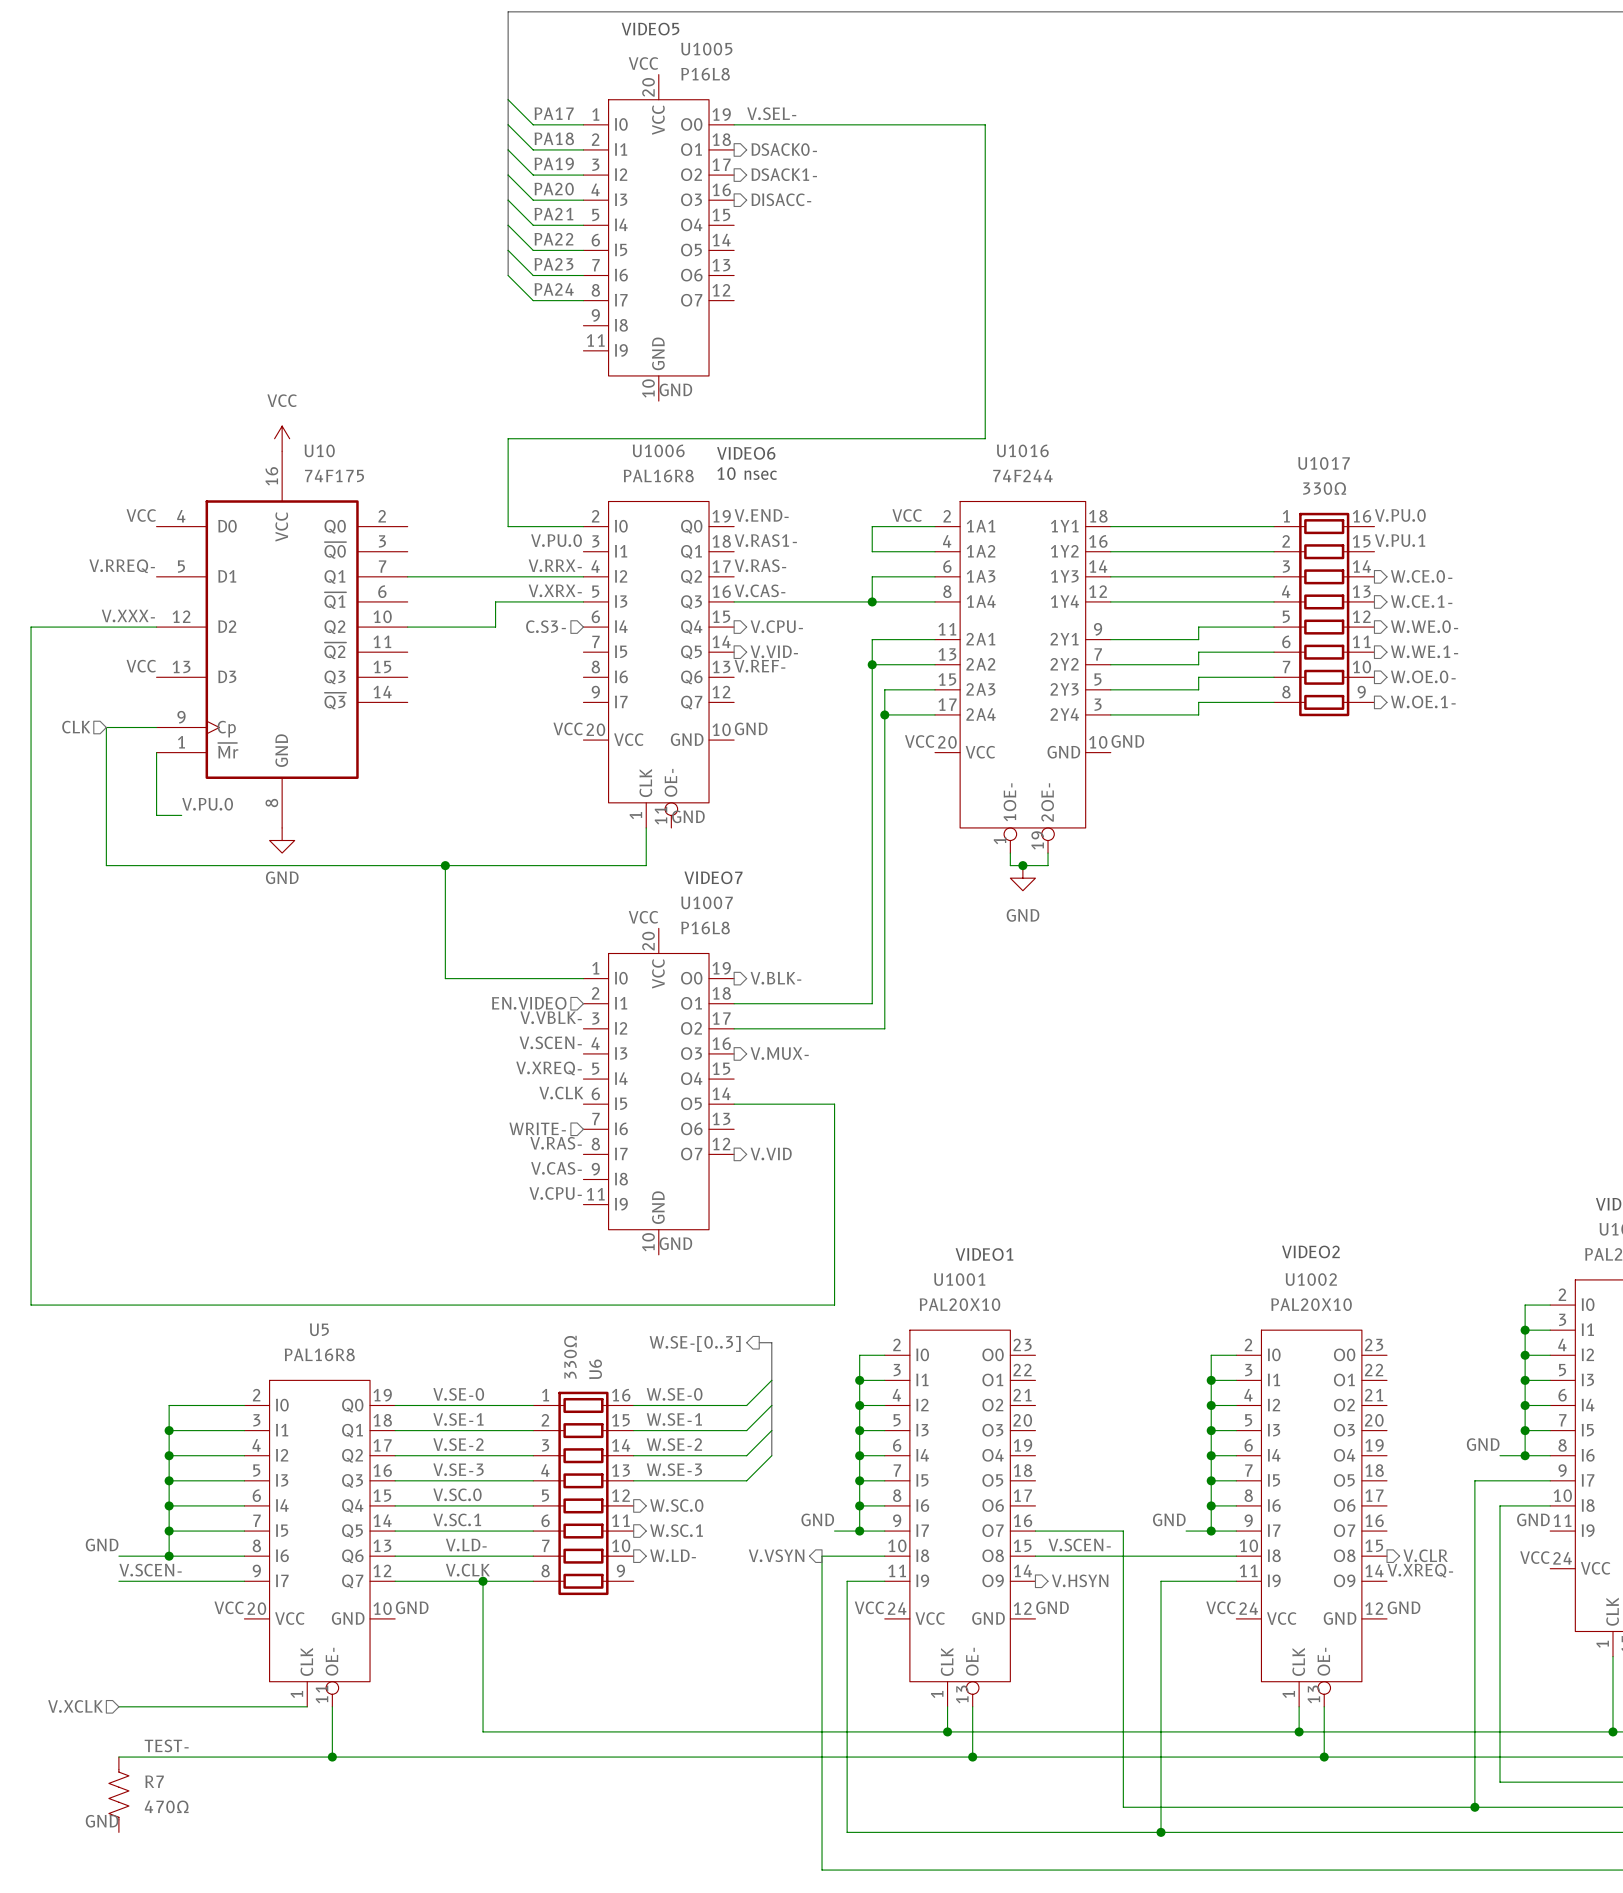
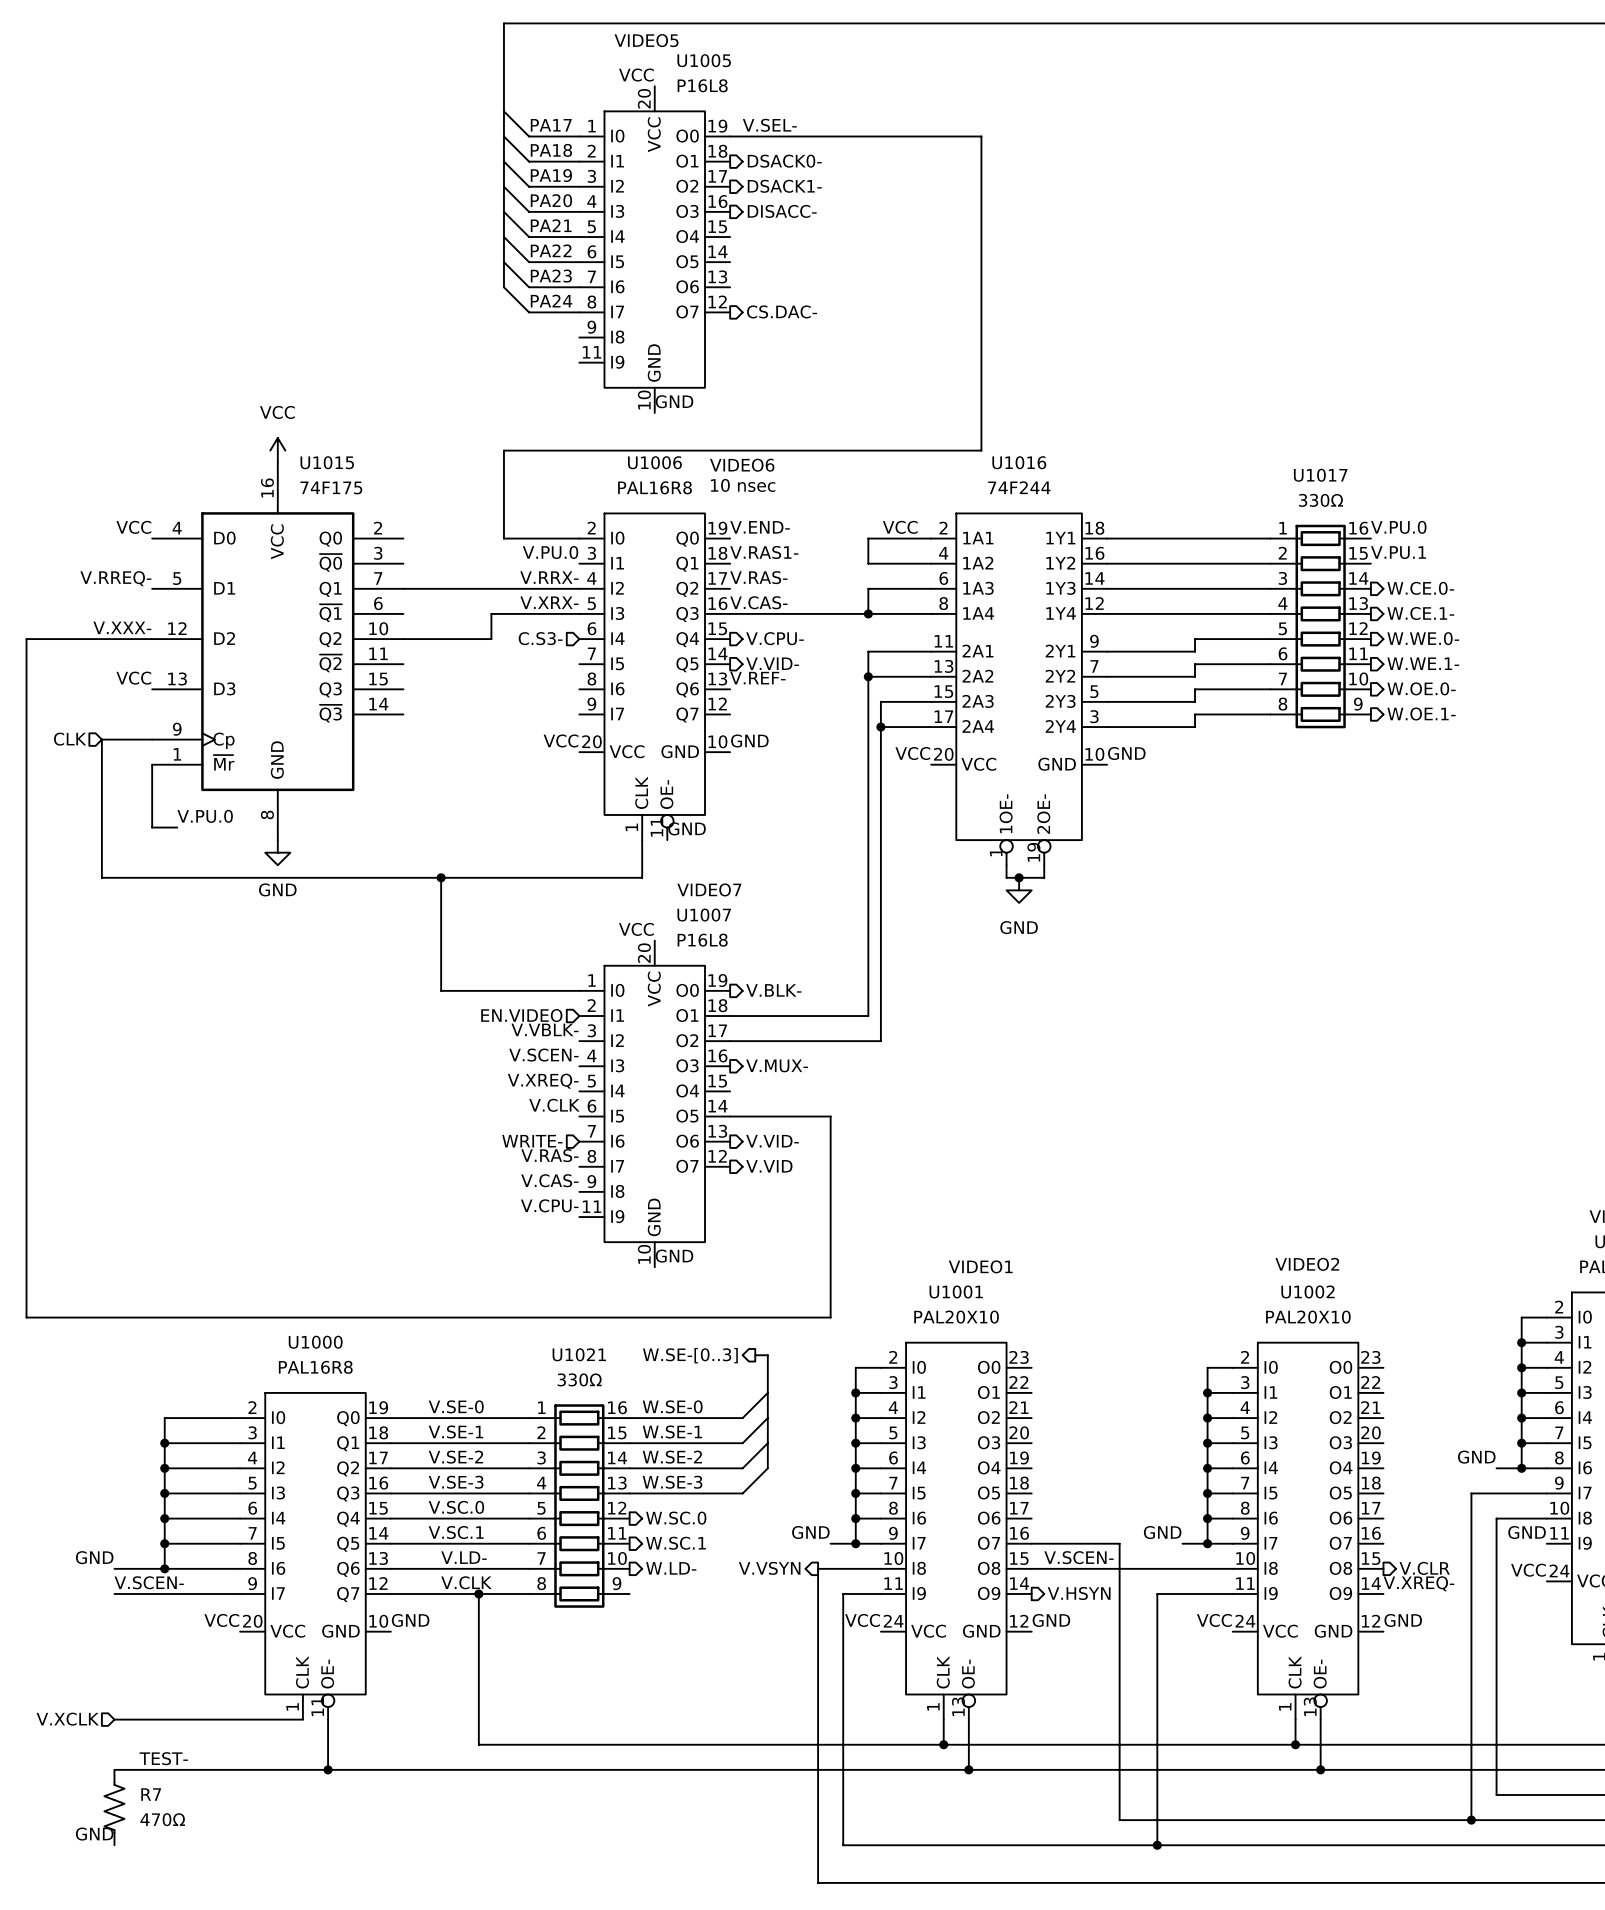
hierarchical label: none -> CS.DAC- (782, 311)
U10 name: U10 (319, 450) -> U1015 (327, 462)
hierarchical label: none -> V.VID- (772, 1141)
U5 name: U5 (319, 1329) -> U1000 (315, 1342)
U6 value rotation: 0° (570, 1357) -> 90° clockwise (579, 1379)
U6 name: U6 (595, 1369) -> U1021 (579, 1354)

